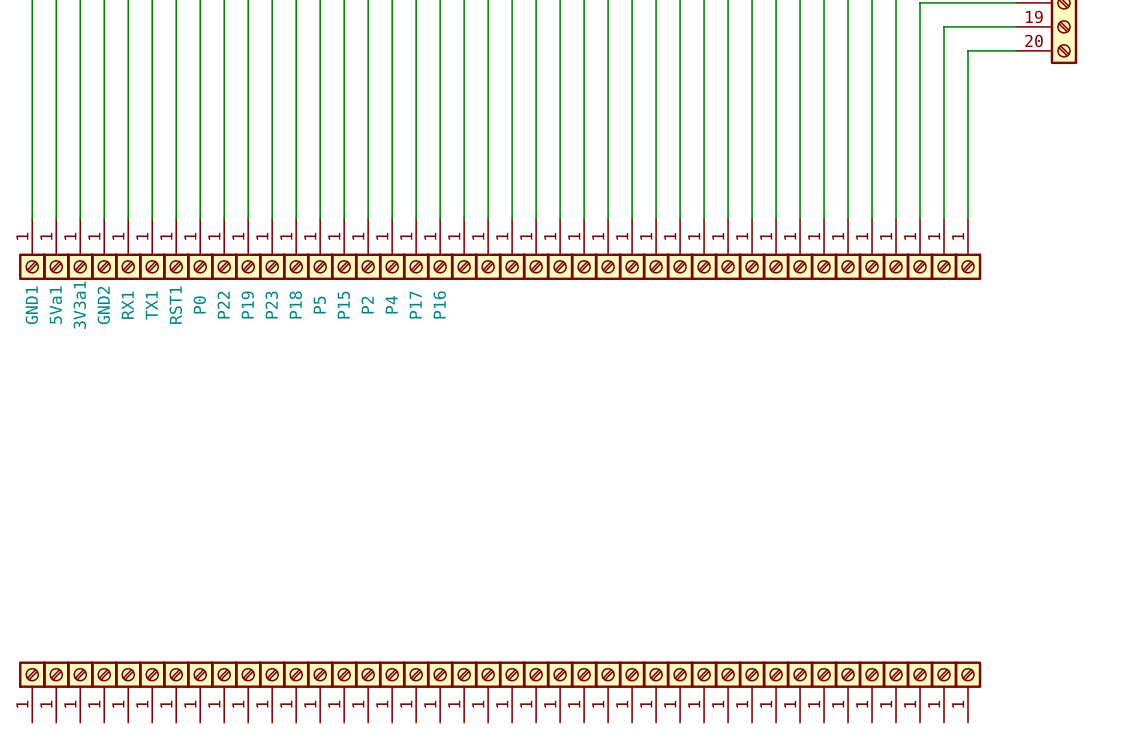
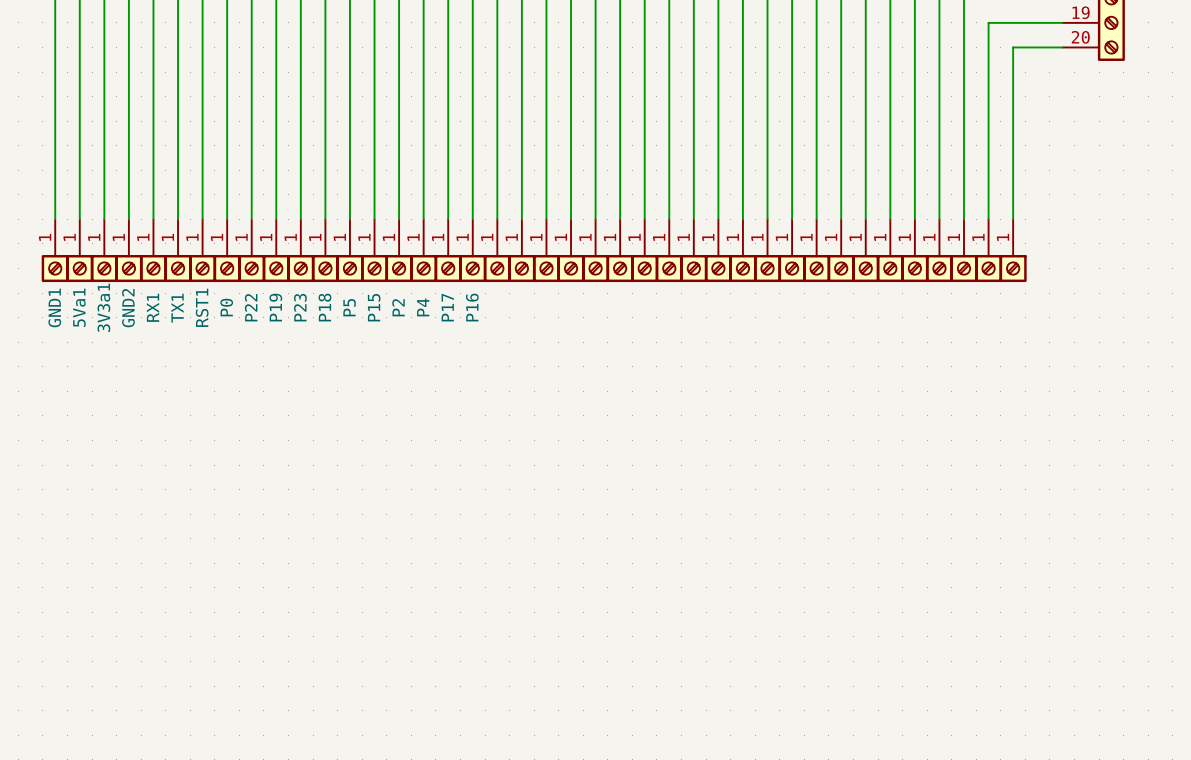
part: (32, 692) -> none
part: (56, 692) -> none
part: (80, 692) -> none
part: (104, 692) -> none
part: (128, 692) -> none
part: (152, 692) -> none
part: (176, 692) -> none
part: (200, 692) -> none
part: (224, 692) -> none
part: (248, 692) -> none
part: (272, 692) -> none
part: (296, 692) -> none
part: (320, 692) -> none
part: (344, 692) -> none
part: (368, 692) -> none
part: (392, 692) -> none
part: (416, 692) -> none
part: (440, 692) -> none
part: (464, 692) -> none
part: (488, 692) -> none
part: (512, 692) -> none
part: (536, 692) -> none
part: (560, 692) -> none
part: (584, 692) -> none
part: (608, 692) -> none
part: (632, 692) -> none
part: (656, 692) -> none
part: (680, 692) -> none
part: (704, 692) -> none
part: (728, 692) -> none
part: (752, 692) -> none
part: (776, 692) -> none
part: (800, 692) -> none
part: (824, 692) -> none
part: (848, 692) -> none
part: (872, 692) -> none
part: (896, 692) -> none
part: (920, 692) -> none
part: (944, 692) -> none
part: (967, 692) -> none

